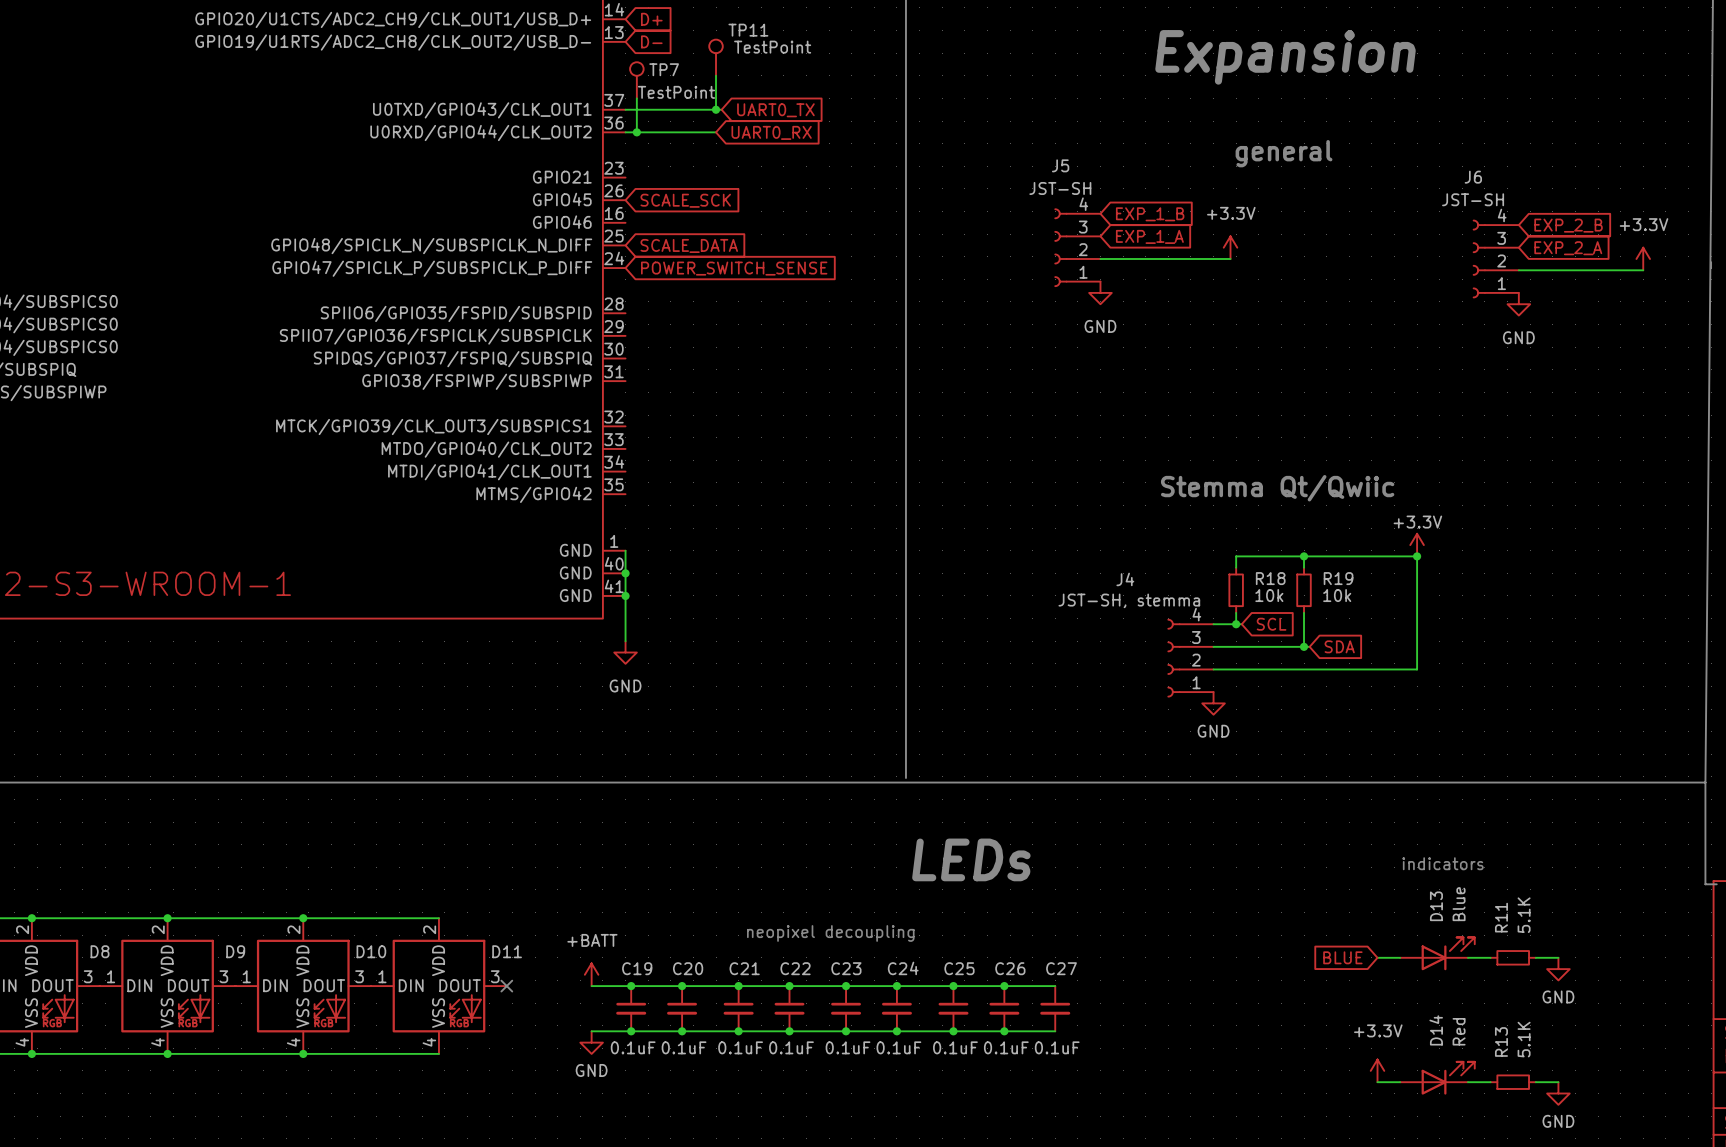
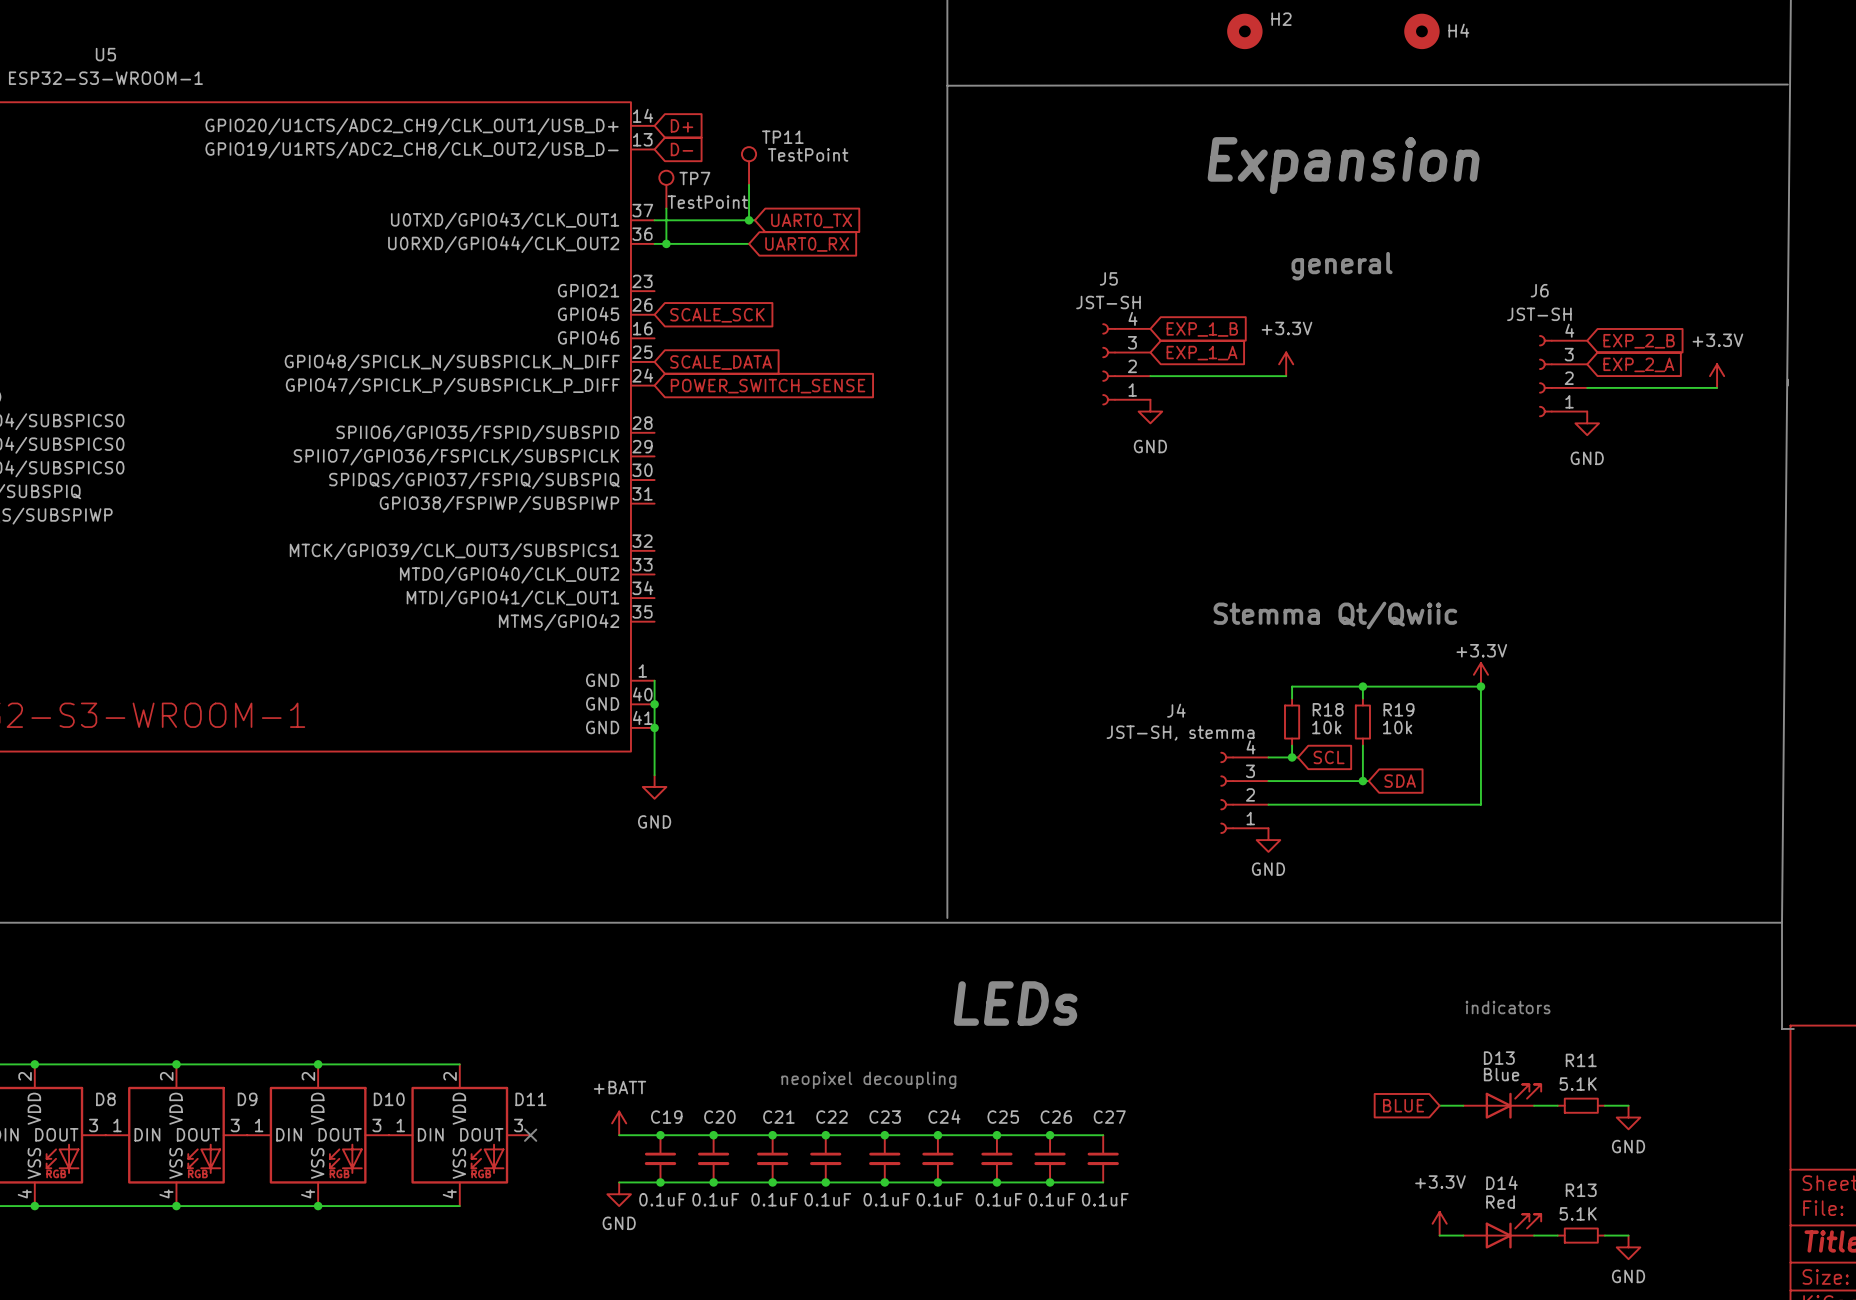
D13 value rotation: 0° (1459, 904) -> 90° clockwise (1501, 1074)
D13 name rotation: 0° (1436, 906) -> 90° clockwise (1499, 1058)
R11 value rotation: 0° (1524, 915) -> 90° clockwise (1578, 1084)
R11 name rotation: 0° (1501, 917) -> 90° clockwise (1581, 1060)
D14 name rotation: 0° (1436, 1030) -> 90° clockwise (1501, 1182)
D14 value rotation: 0° (1459, 1031) -> 90° clockwise (1500, 1202)
R13 value rotation: 0° (1524, 1039) -> 90° clockwise (1578, 1213)
R13 name rotation: 0° (1501, 1041) -> 90° clockwise (1581, 1190)

